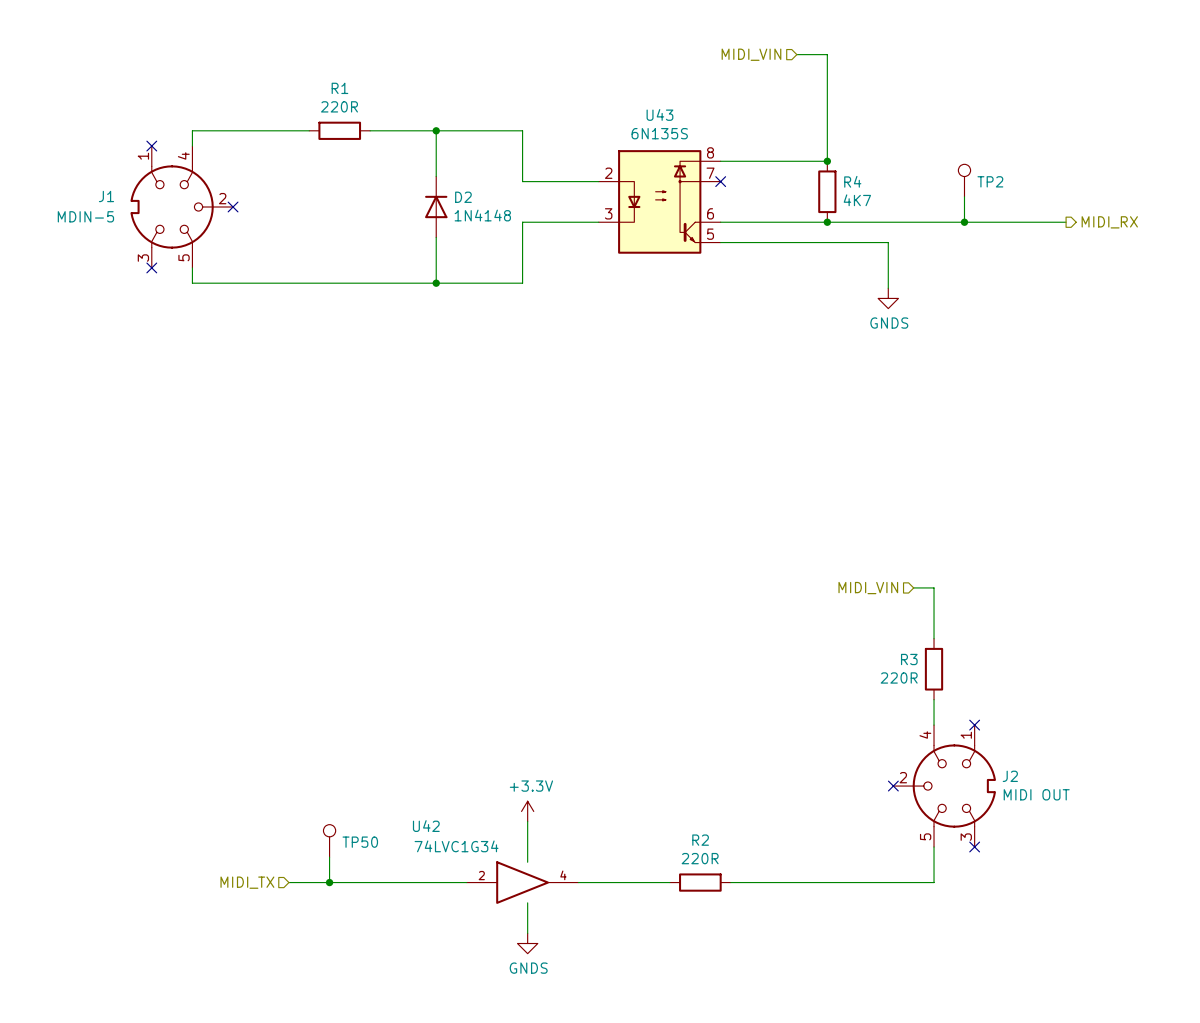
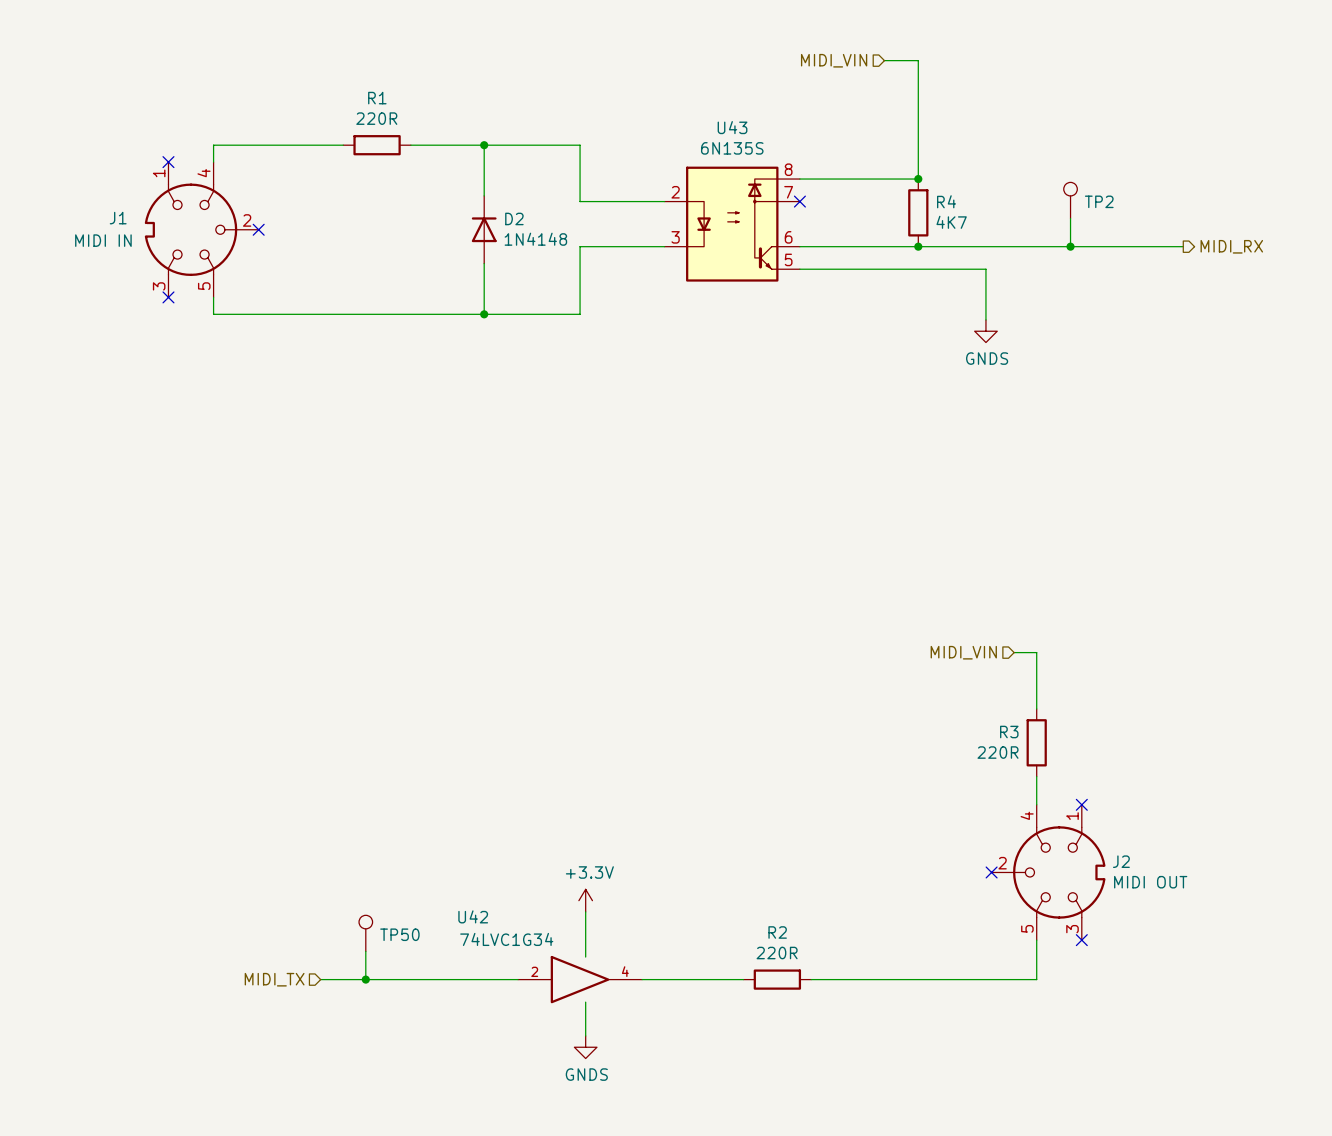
J1 value: MDIN-5 (85, 216) -> MIDI IN (103, 240)

